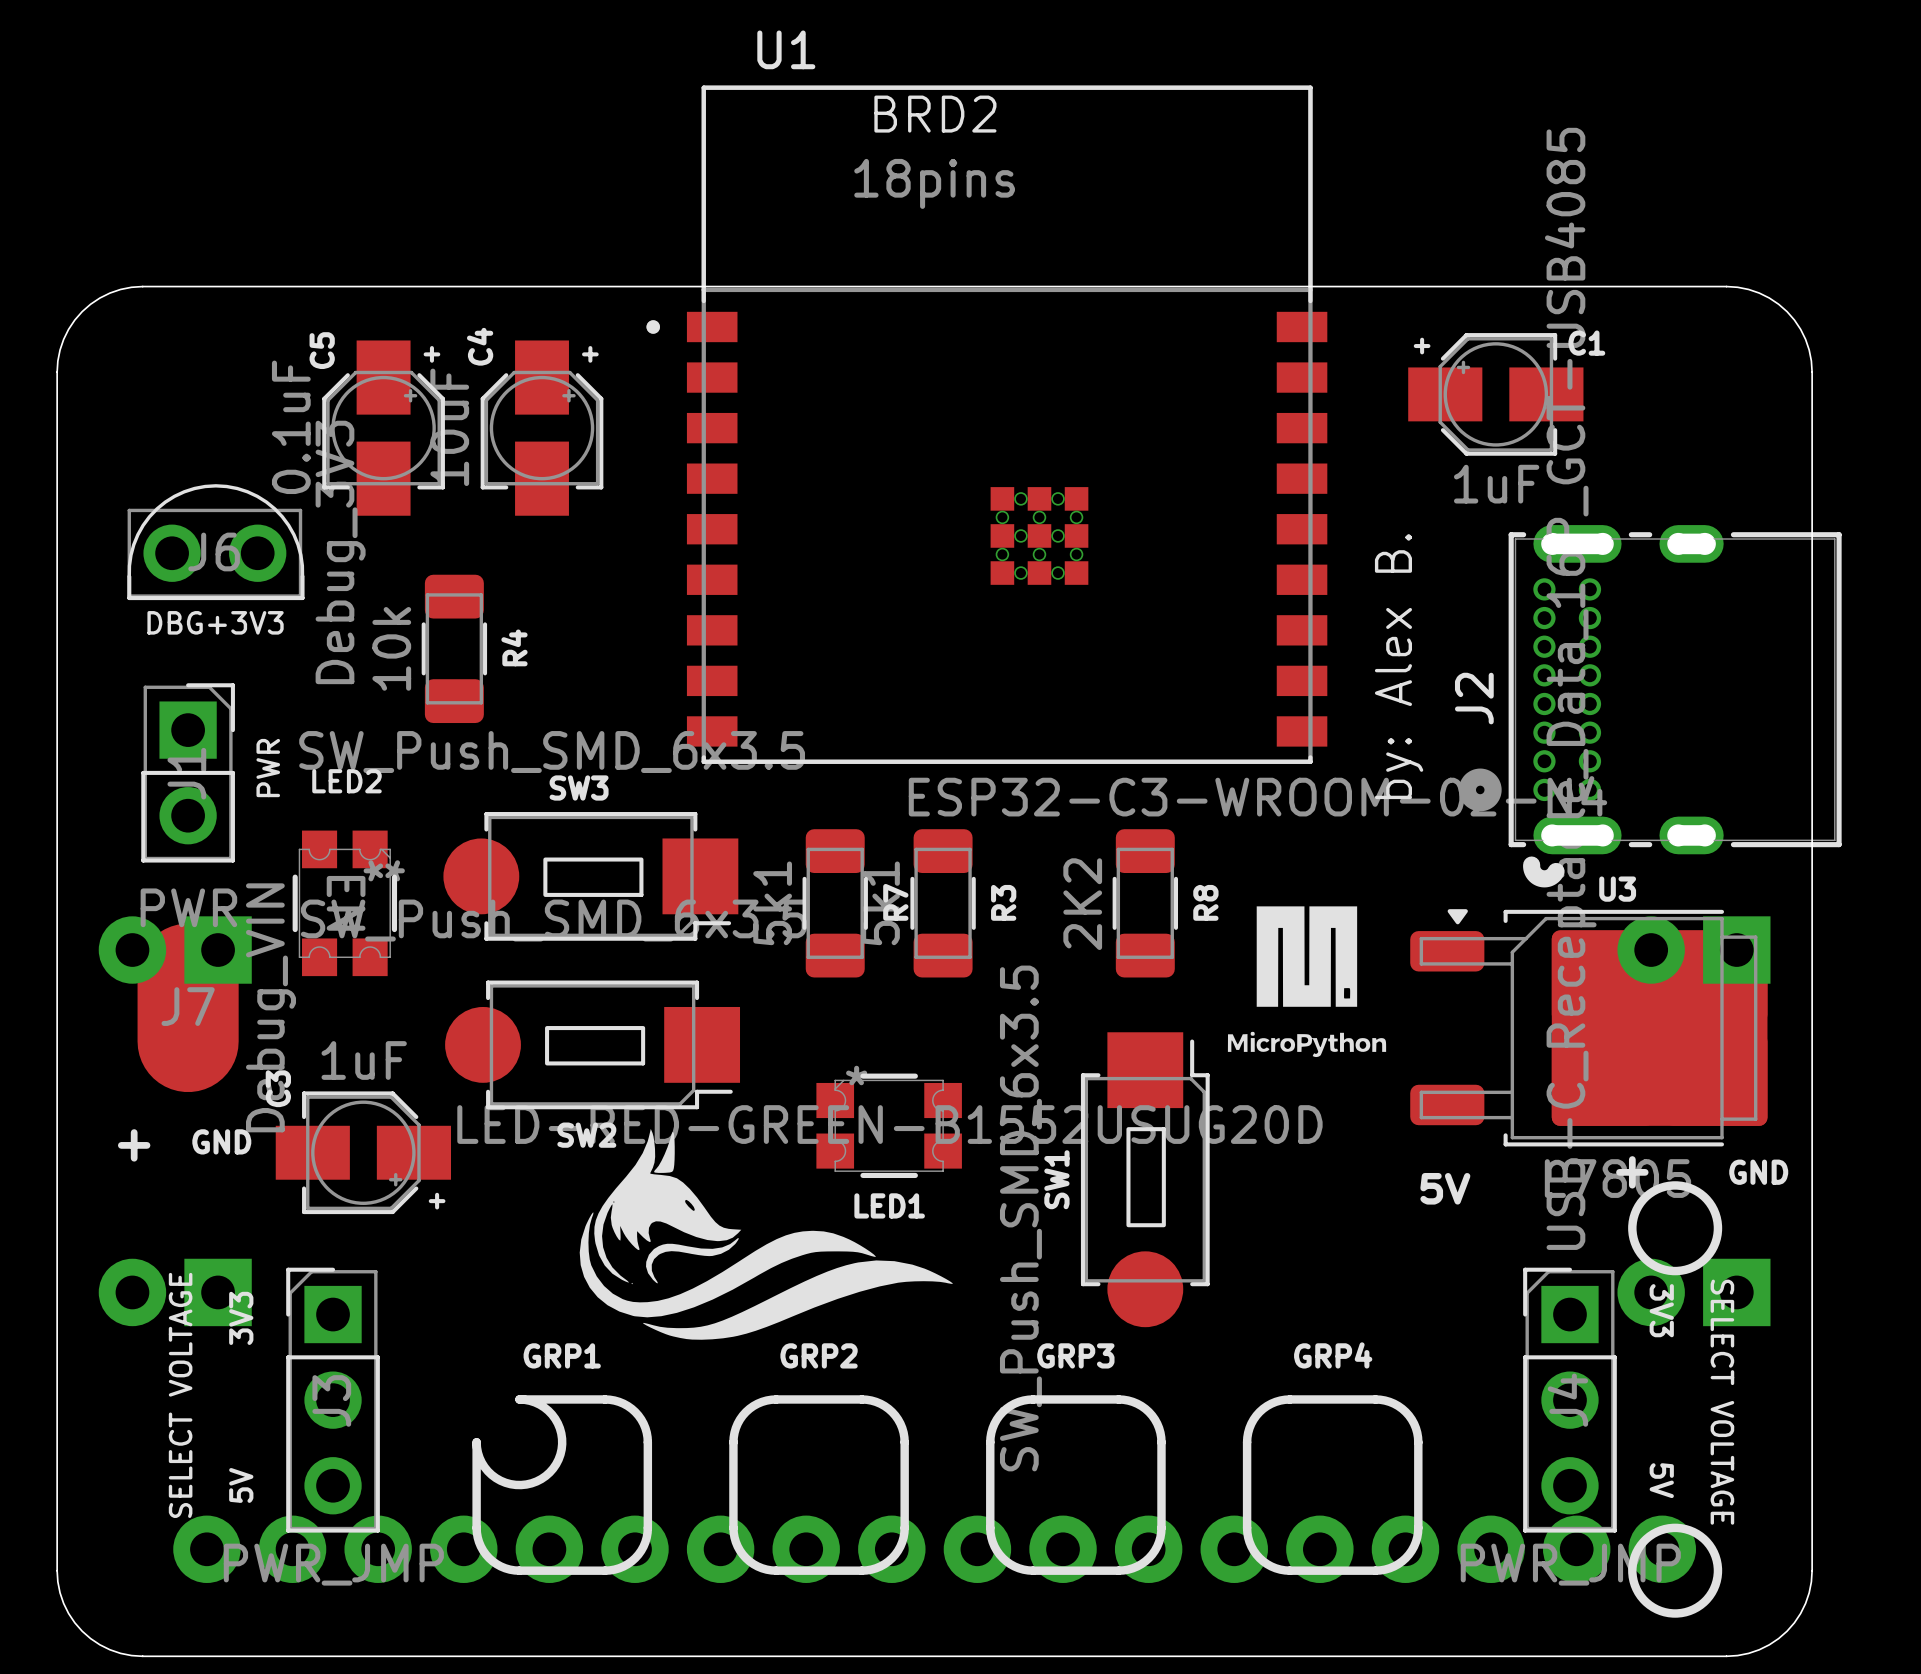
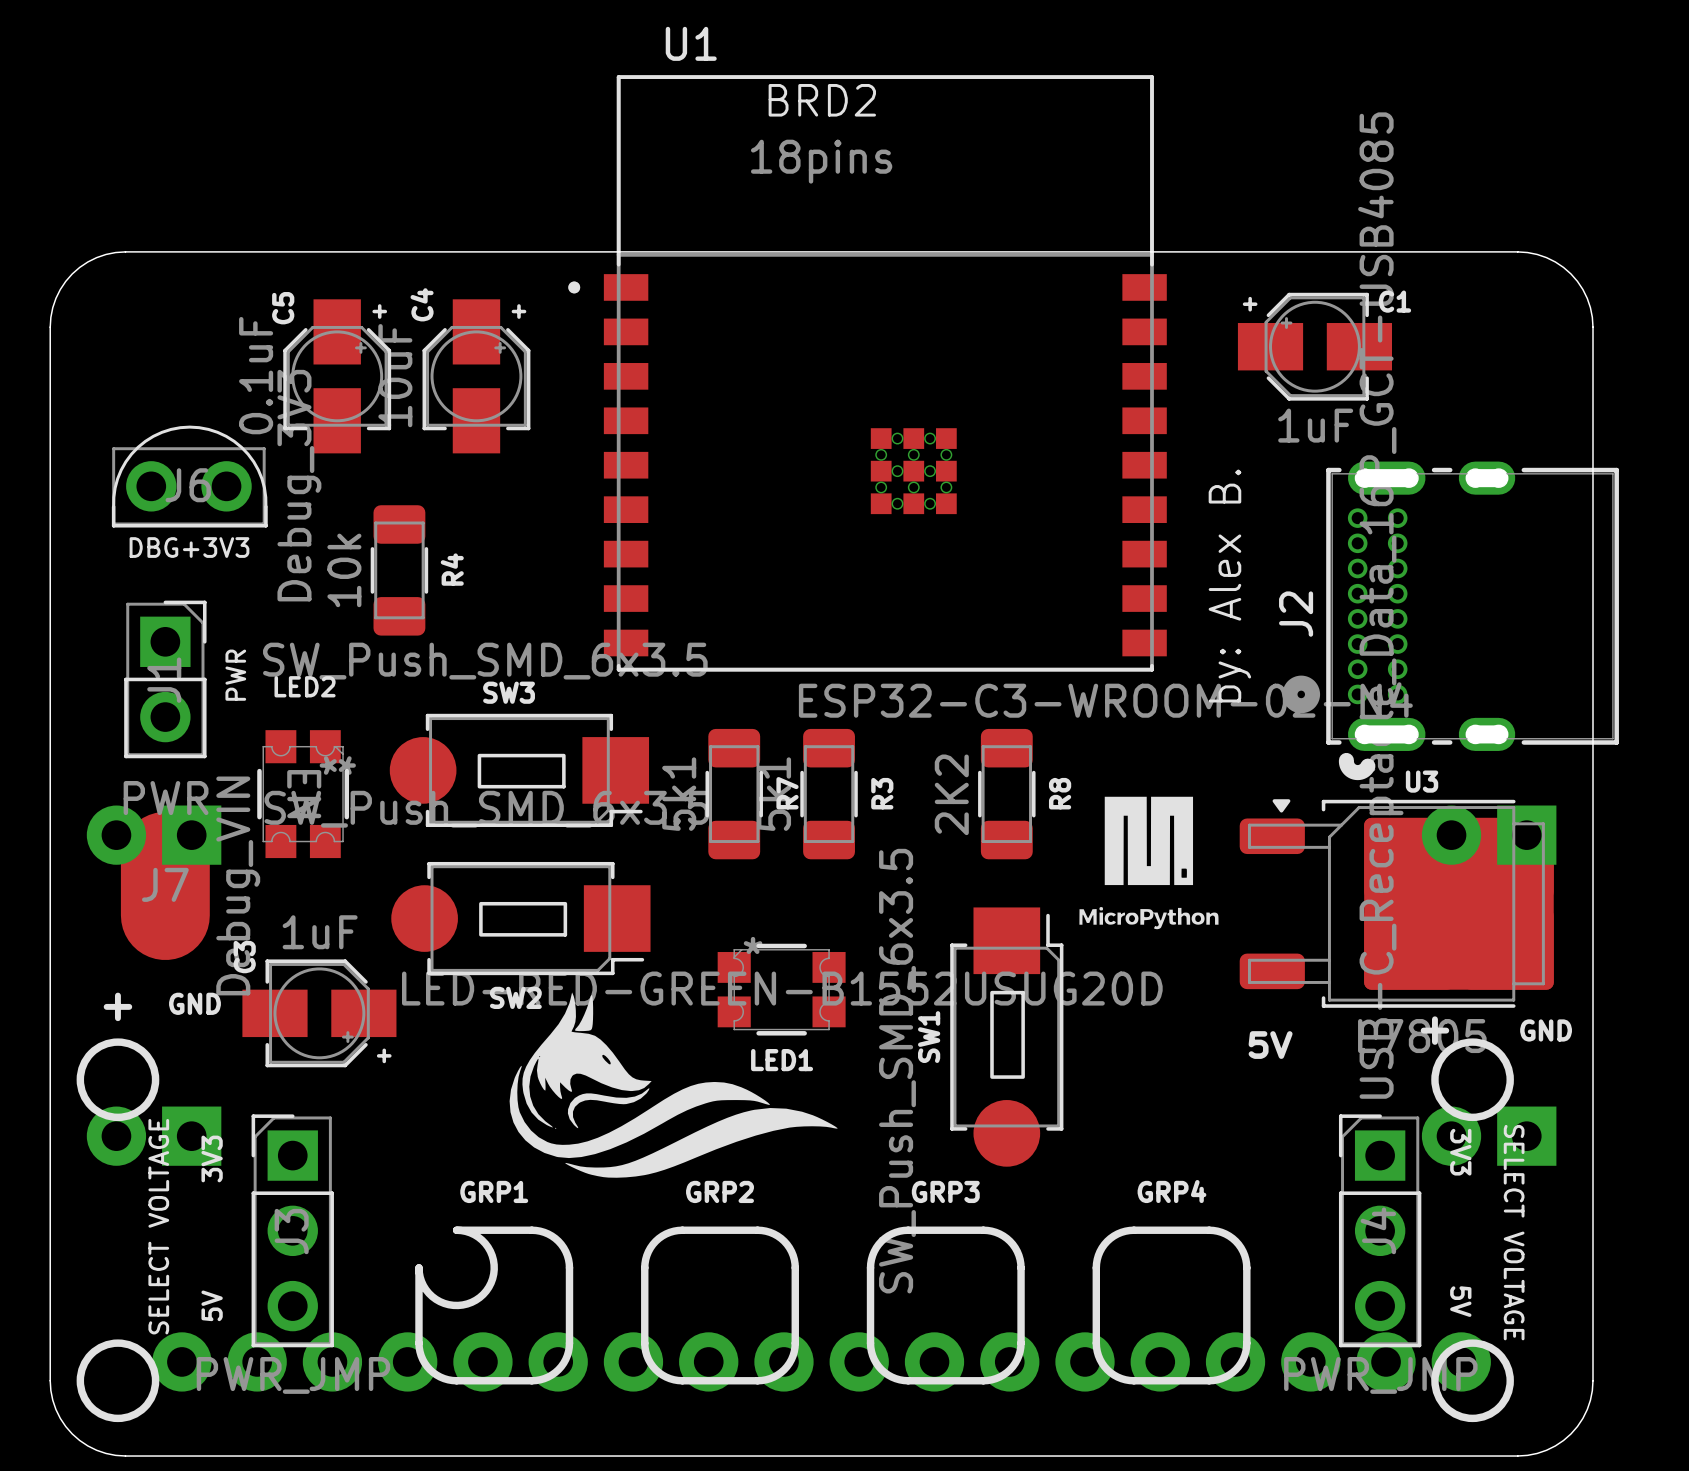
drawing: none -> [76, 1038, 160, 1122]
drawing: none -> [76, 1339, 160, 1423]

